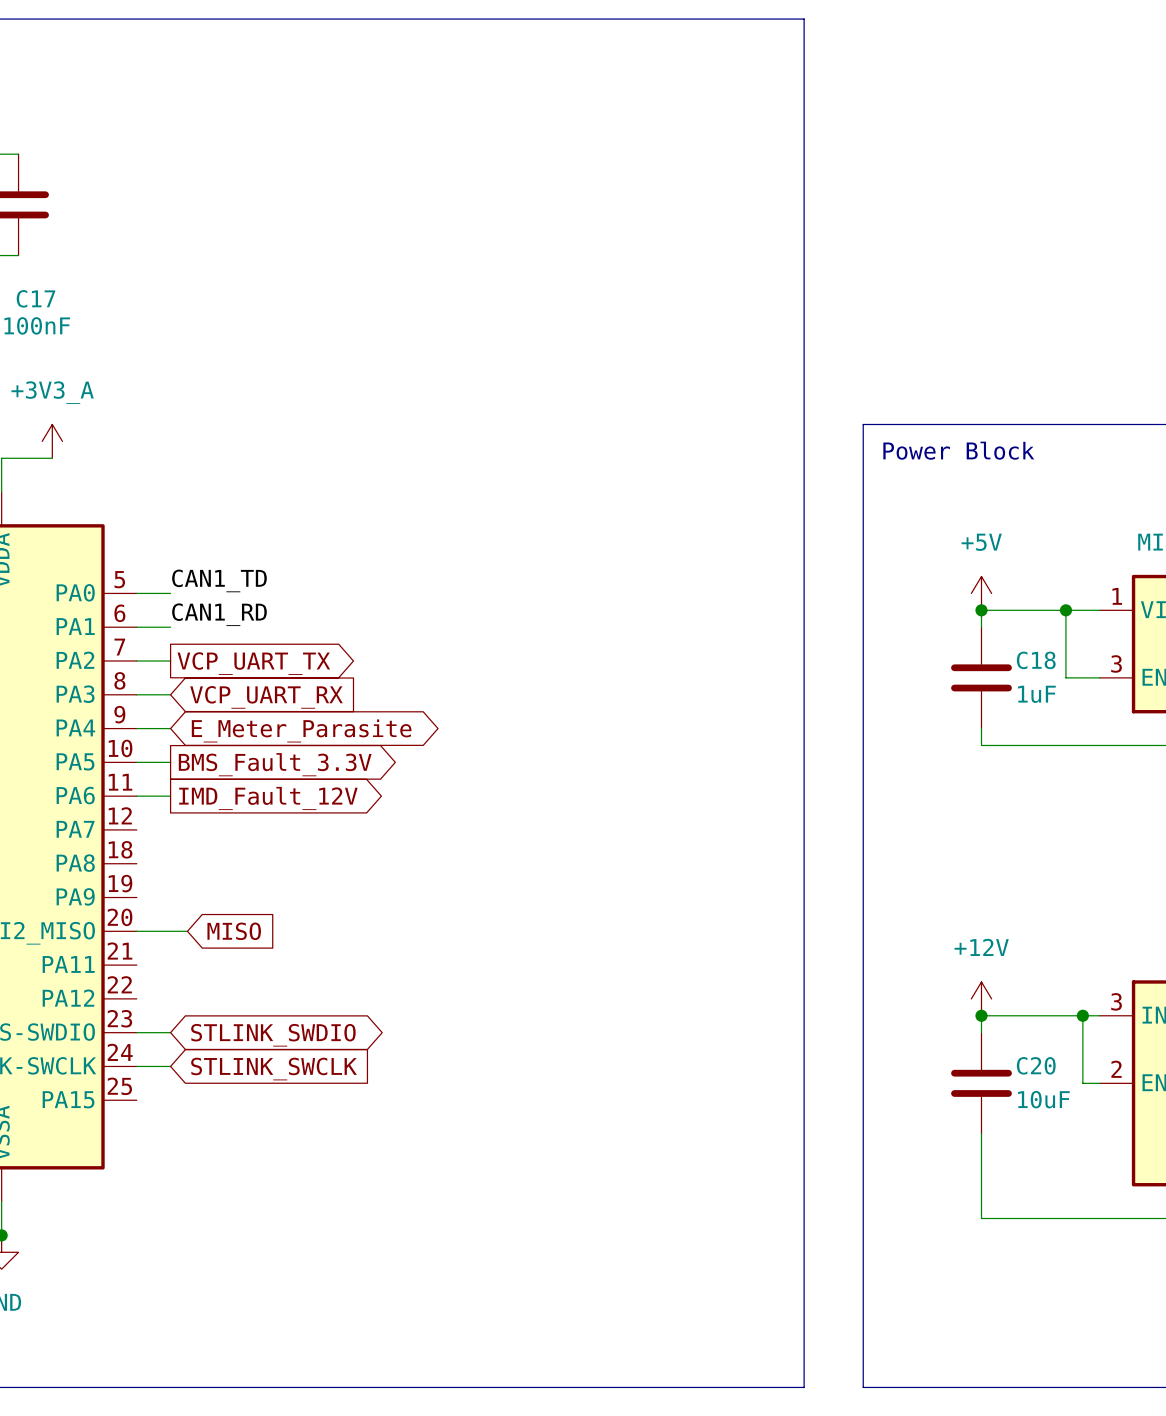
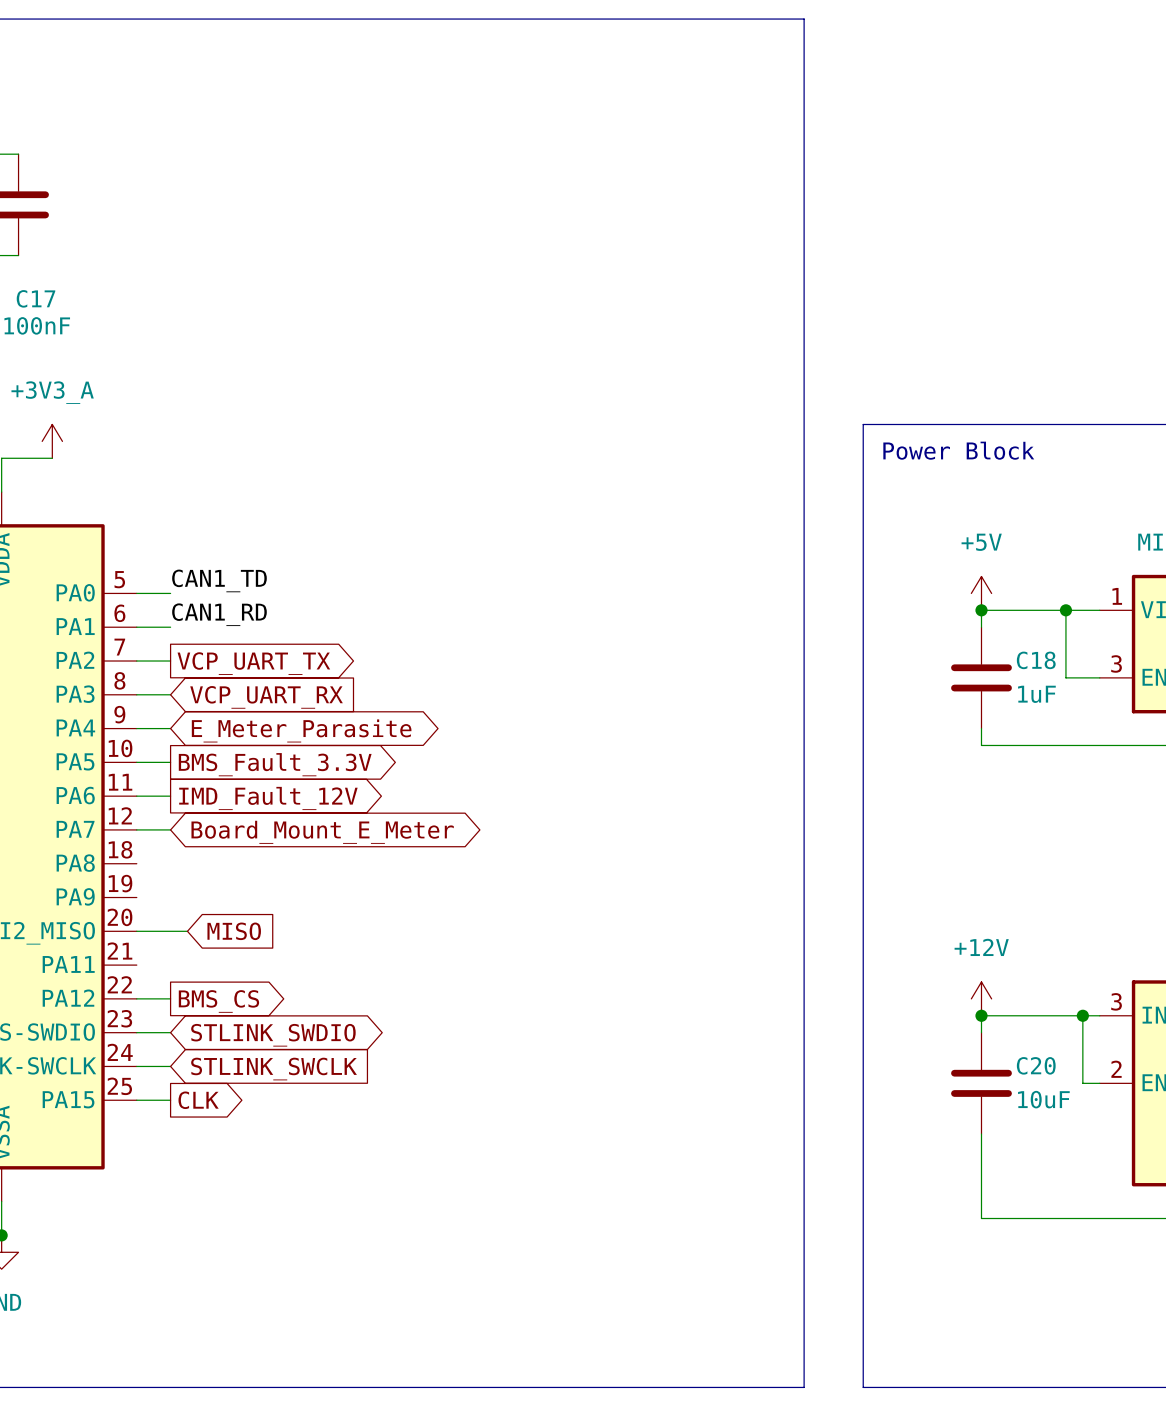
wire: none -> (136, 829) (170, 829)
global label: none -> Board_Mount_E_Meter (322, 832)
wire: none -> (136, 998) (170, 998)
global label: none -> BMS_CS (218, 1001)
wire: none -> (136, 1100) (170, 1100)
global label: none -> CLK (198, 1100)

